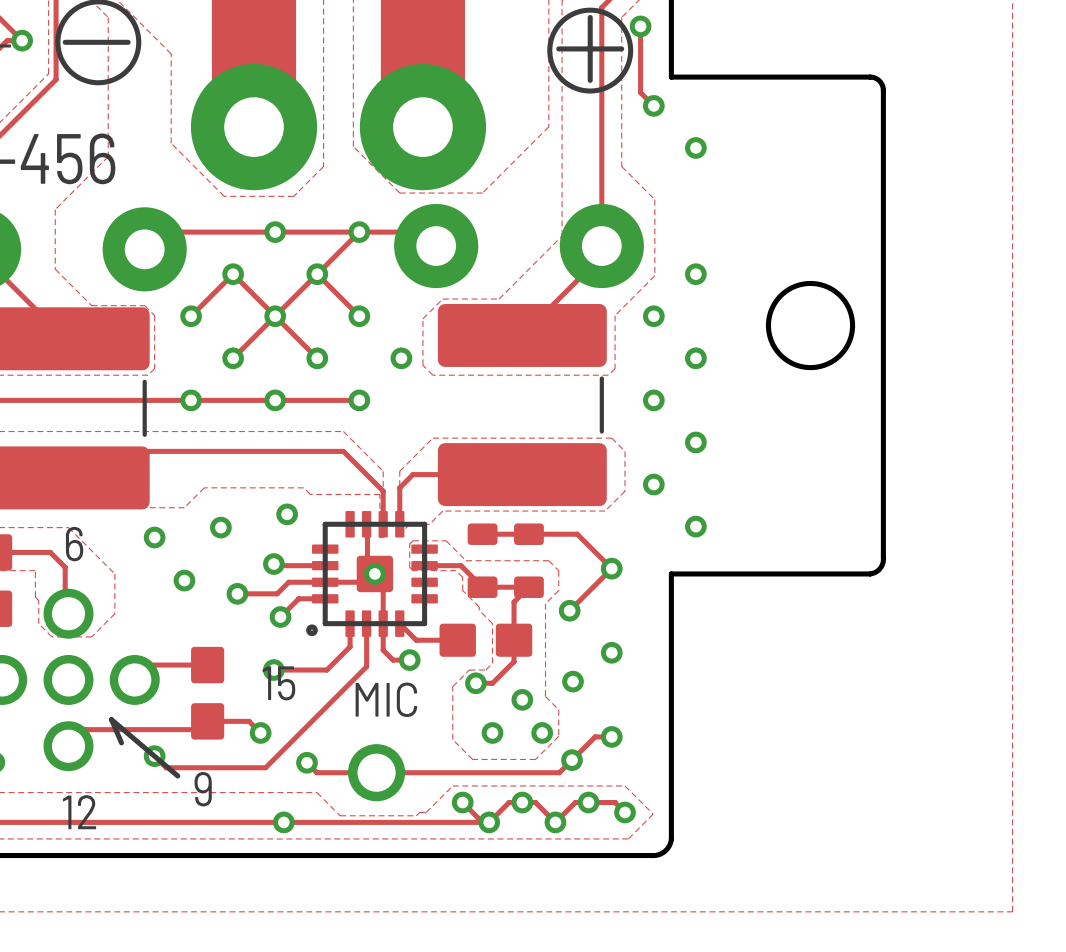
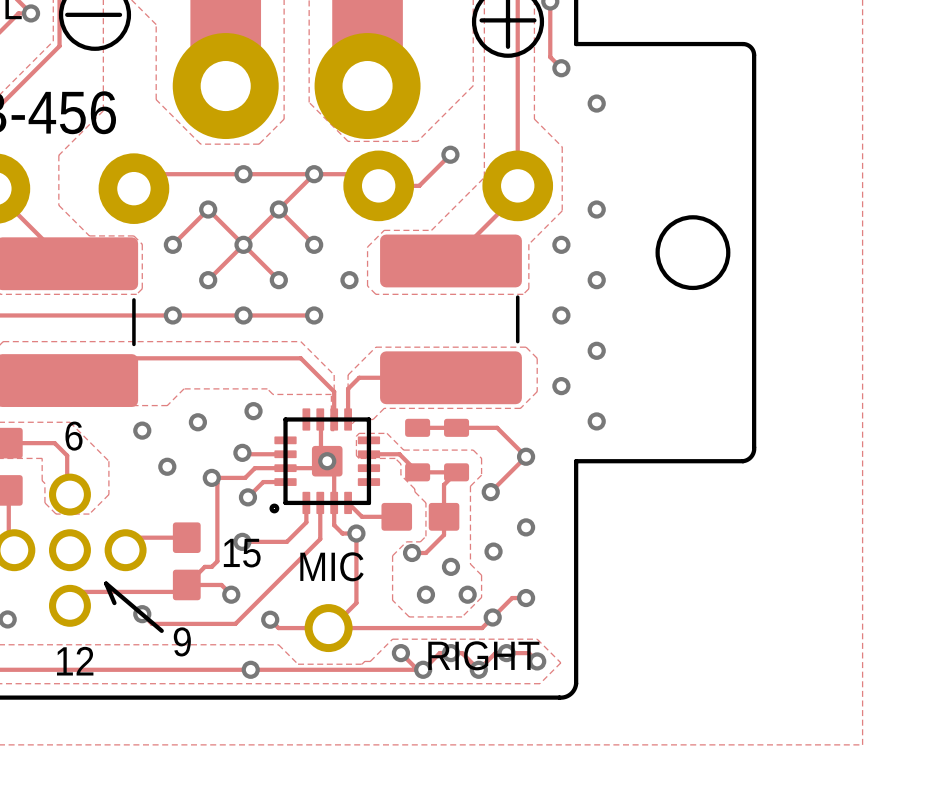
track: none -> (450, 154) (419, 185) (378, 185)
via: none -> (450, 154)
track: none -> (211, 477) (217, 483) (217, 561) (211, 566) (204, 566) (186, 584)
track: none -> (356, 533) (356, 603) (331, 628)
text: none -> RIGHT (483, 655)

